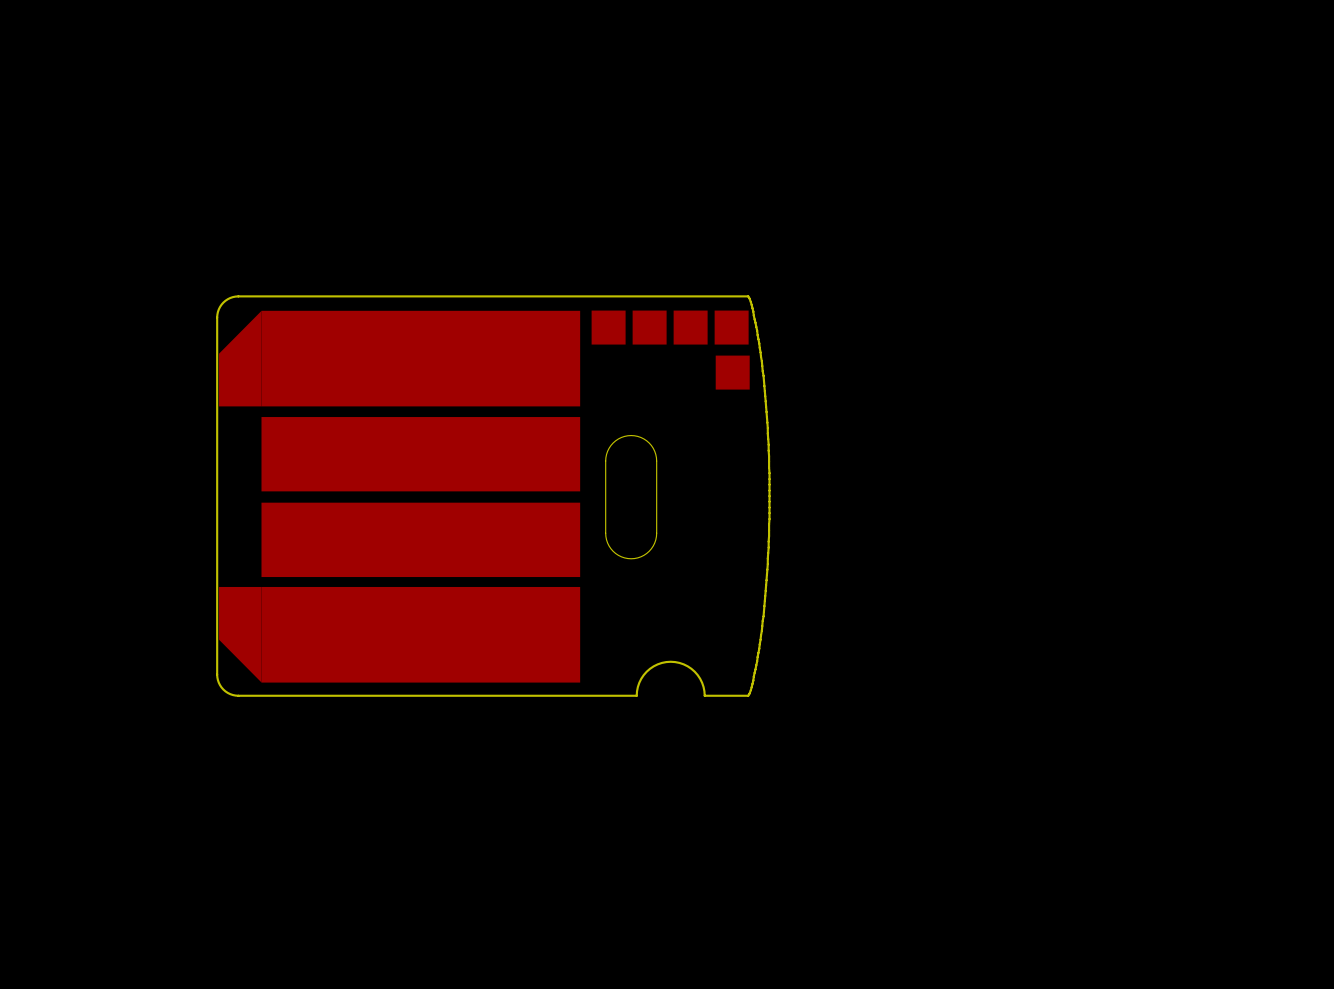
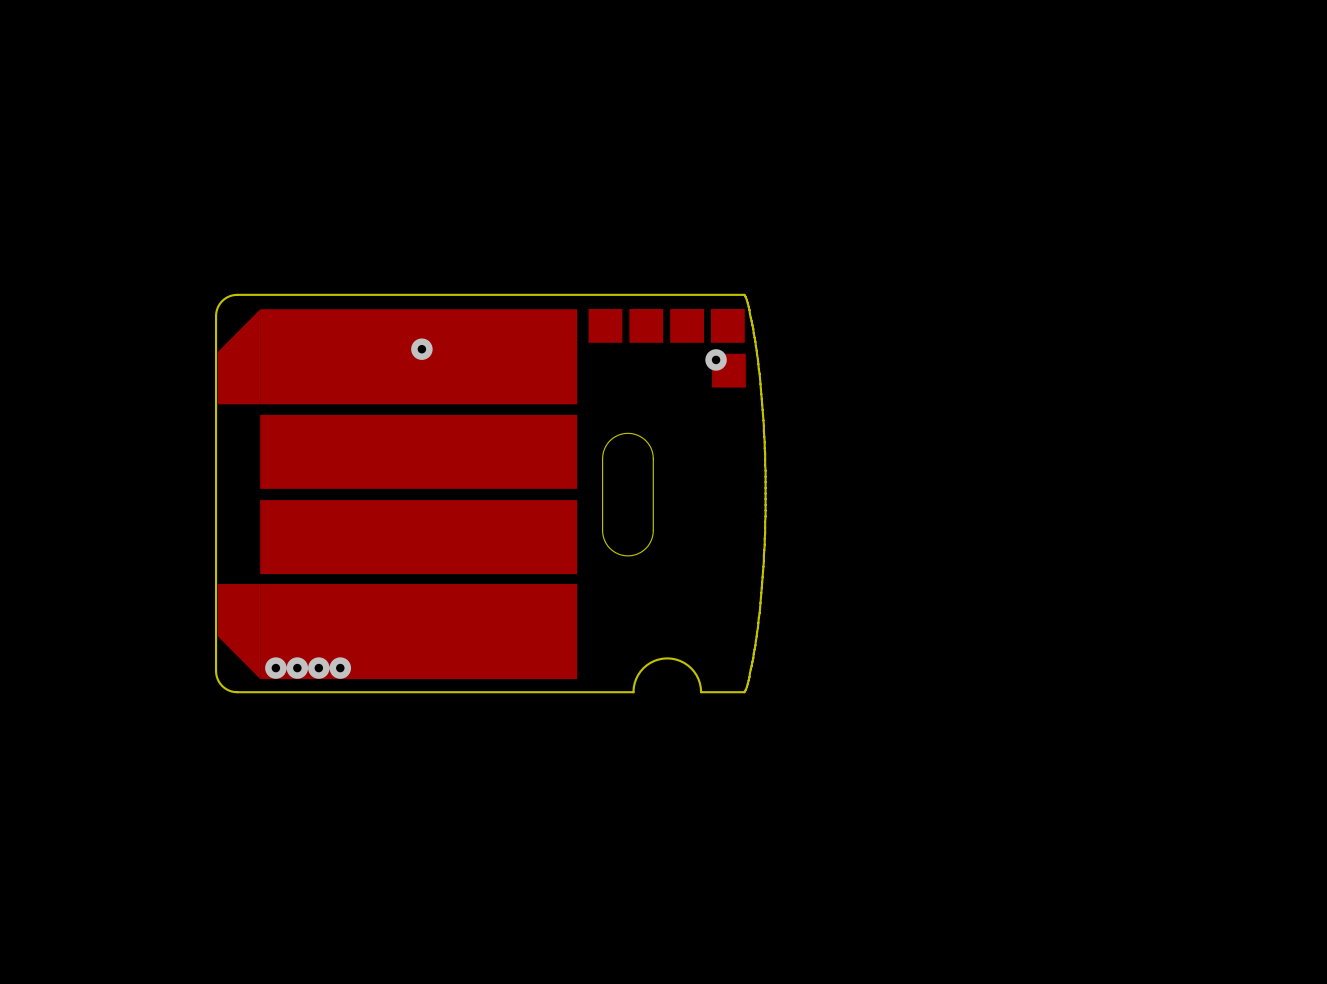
via: none -> (421, 349)
via: none -> (716, 359)
via: none -> (275, 668)
via: none -> (297, 668)
via: none -> (318, 668)
via: none -> (340, 668)

